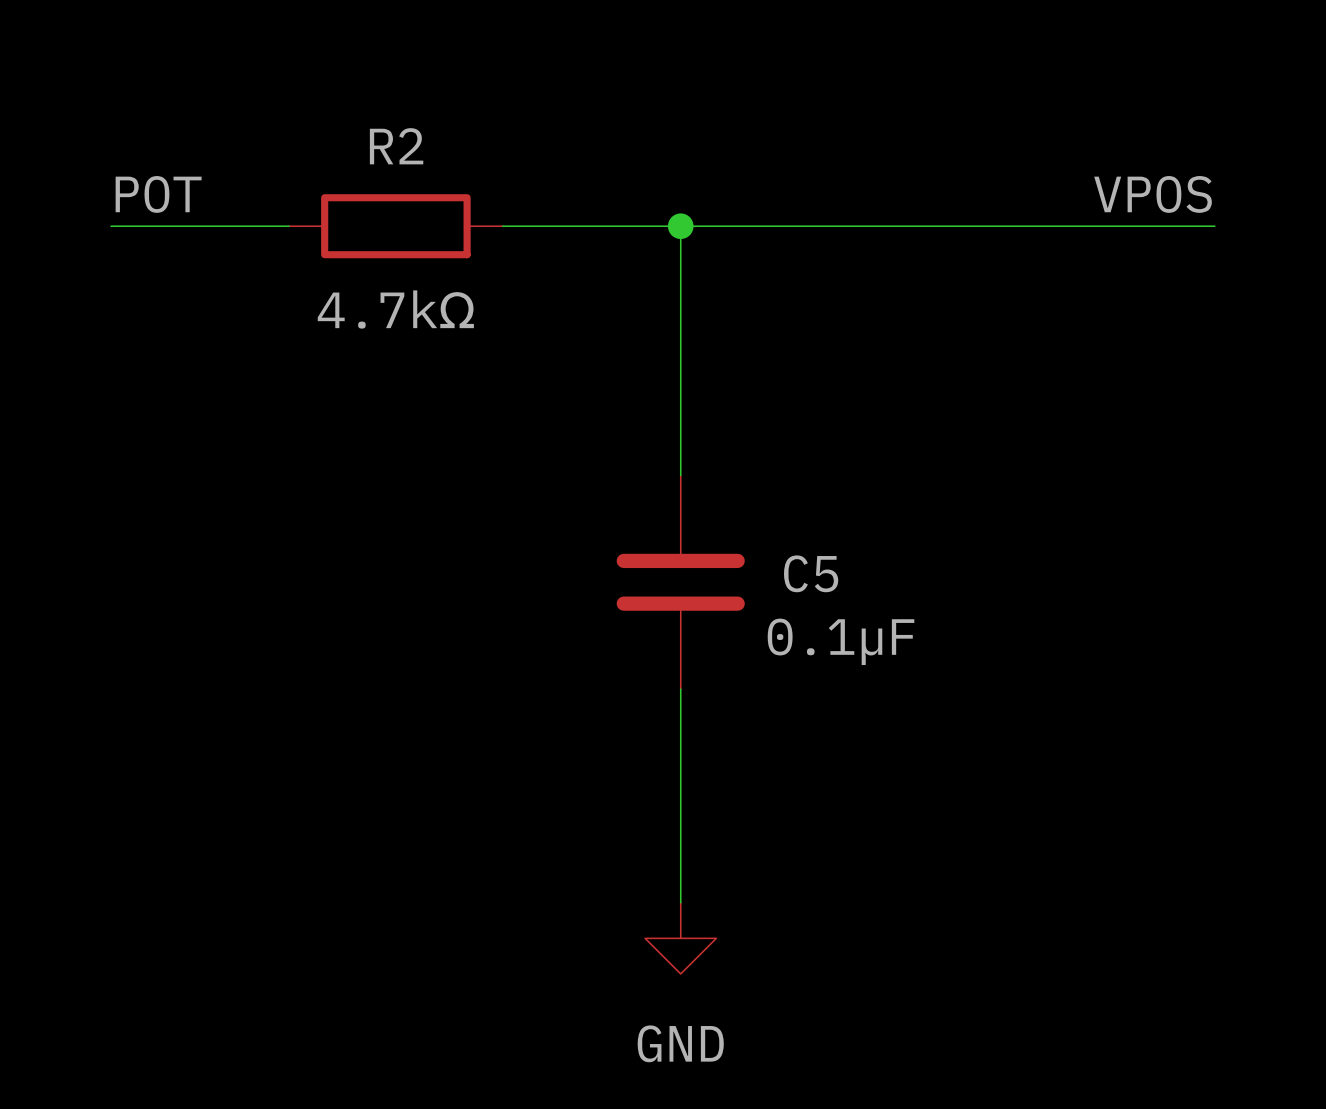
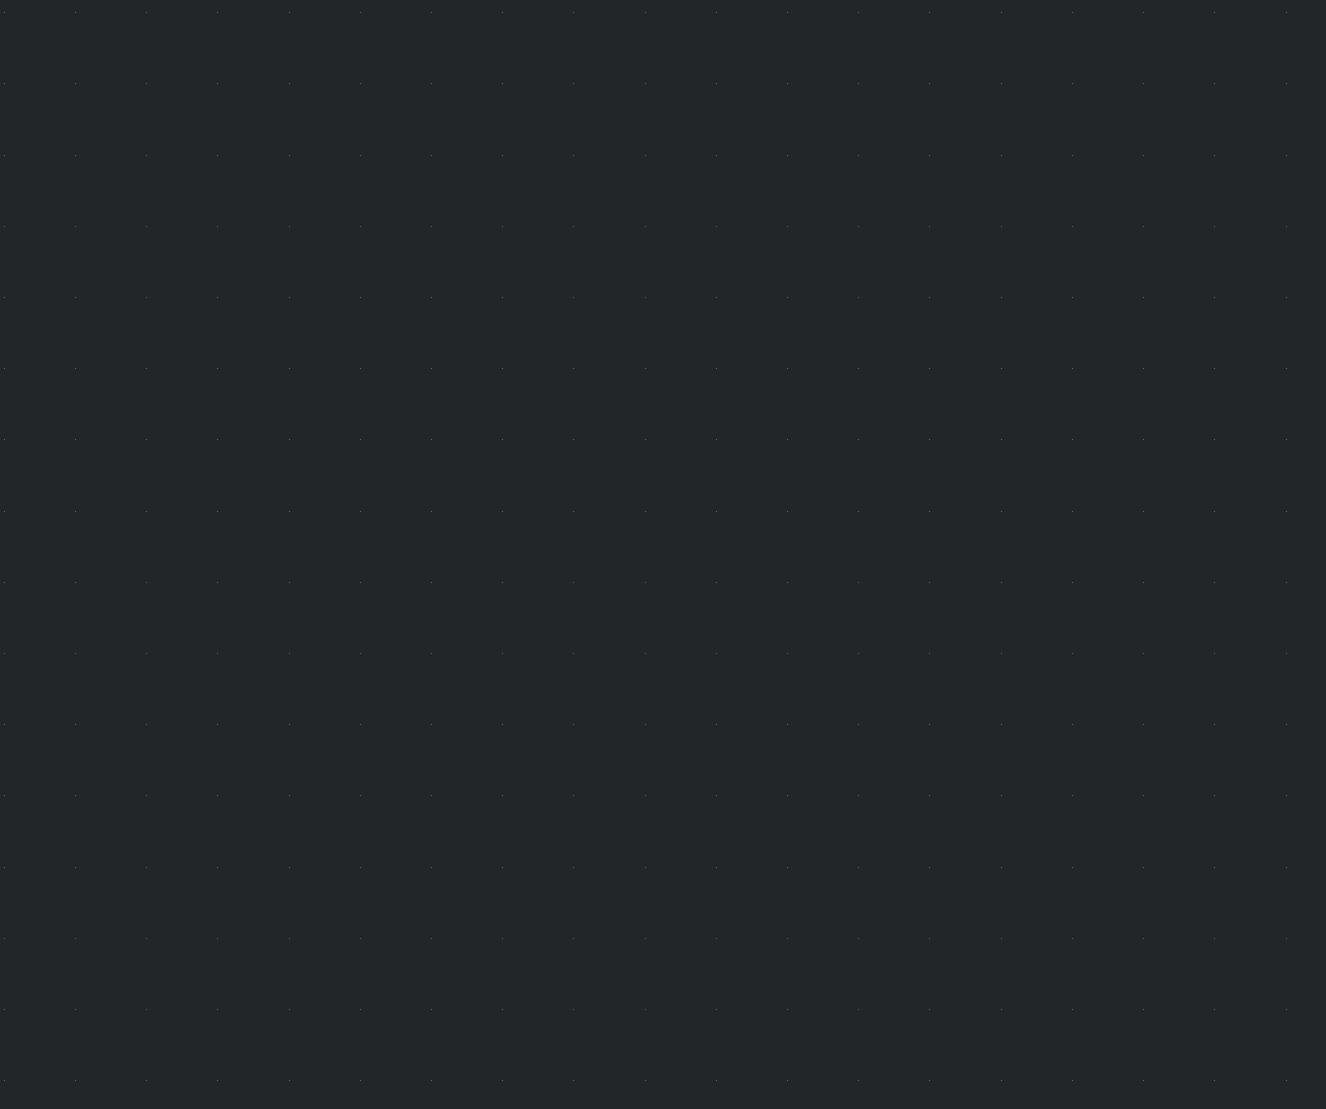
label: POT (158, 194) -> none
label: VPOS (1153, 194) -> none
wire: (111, 226) (289, 226) -> none
R2: 4.7kΩ (395, 226) -> none
wire: (502, 226) (1214, 226) -> none
wire: (680, 226) (680, 475) -> none
junction: (680, 226) -> none
C5: 0.1µF (680, 582) -> none
wire: (680, 689) (680, 902) -> none
power symbol: GND (680, 938) -> none

